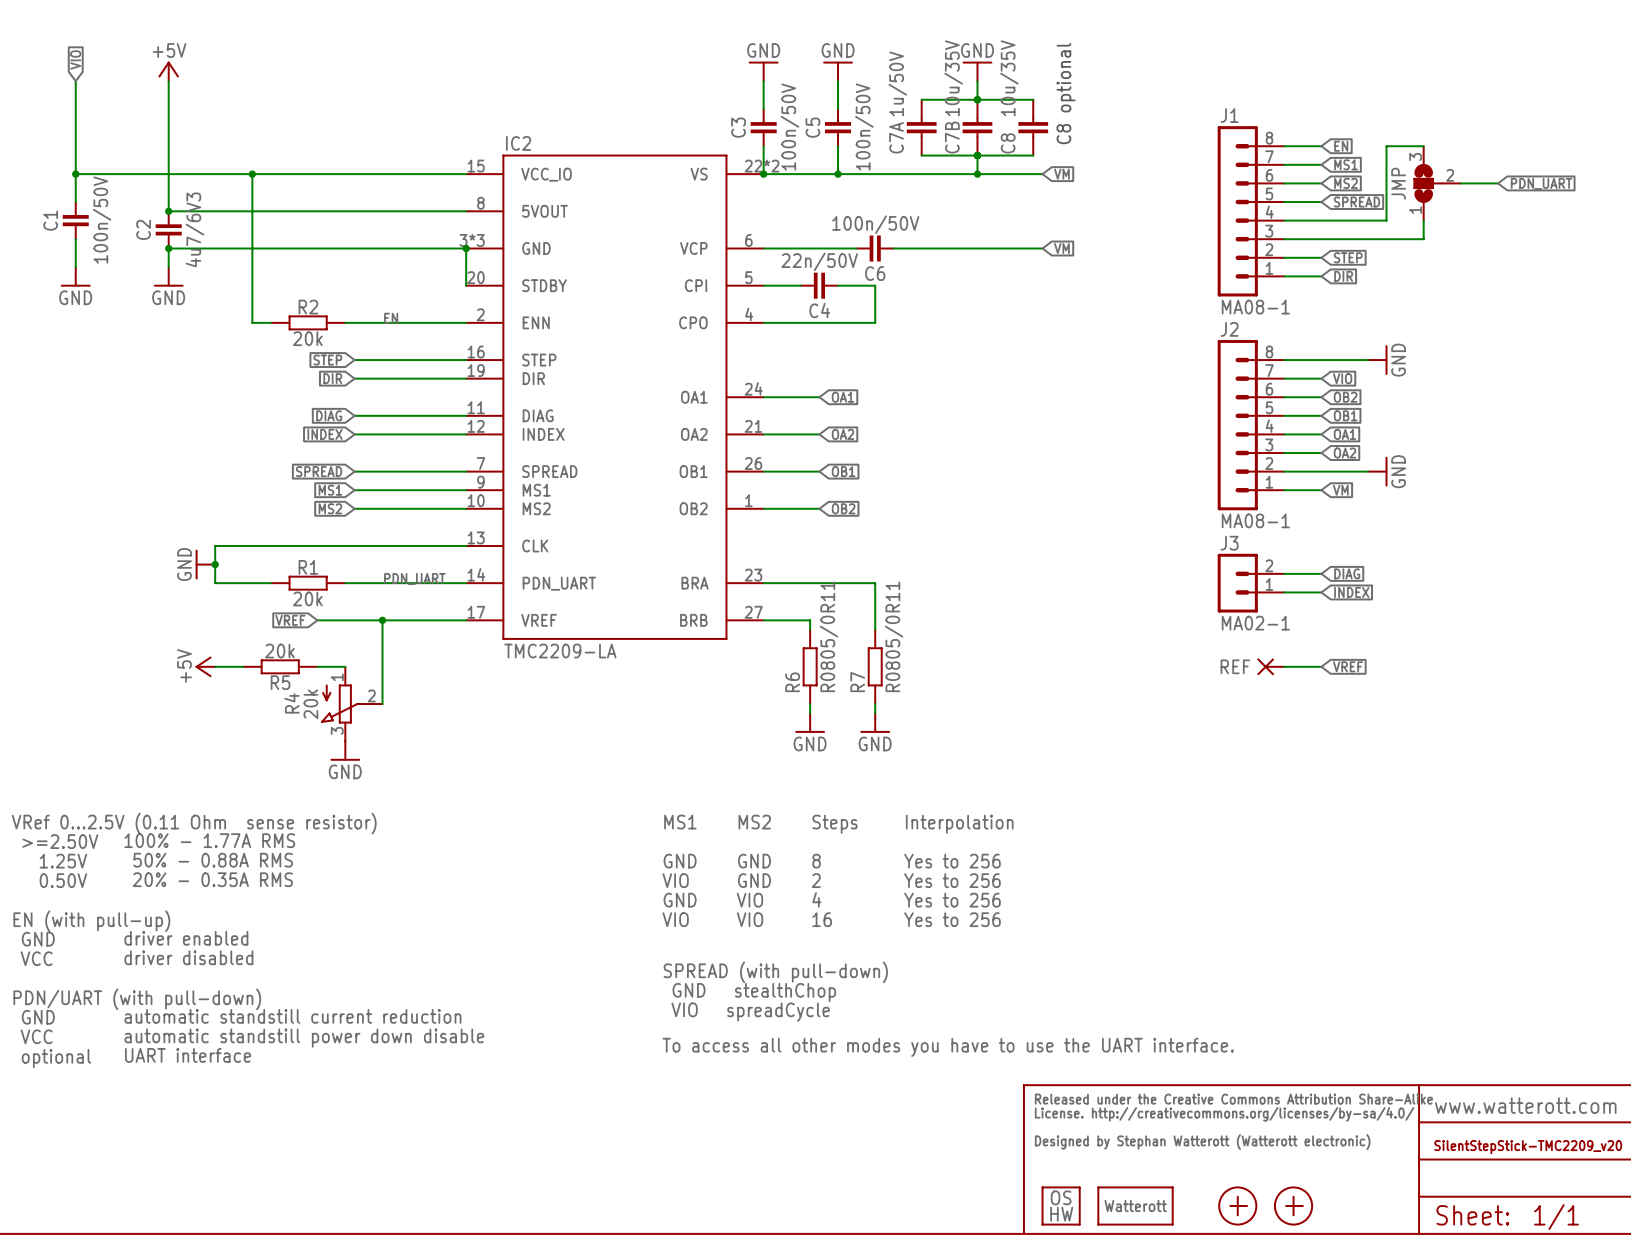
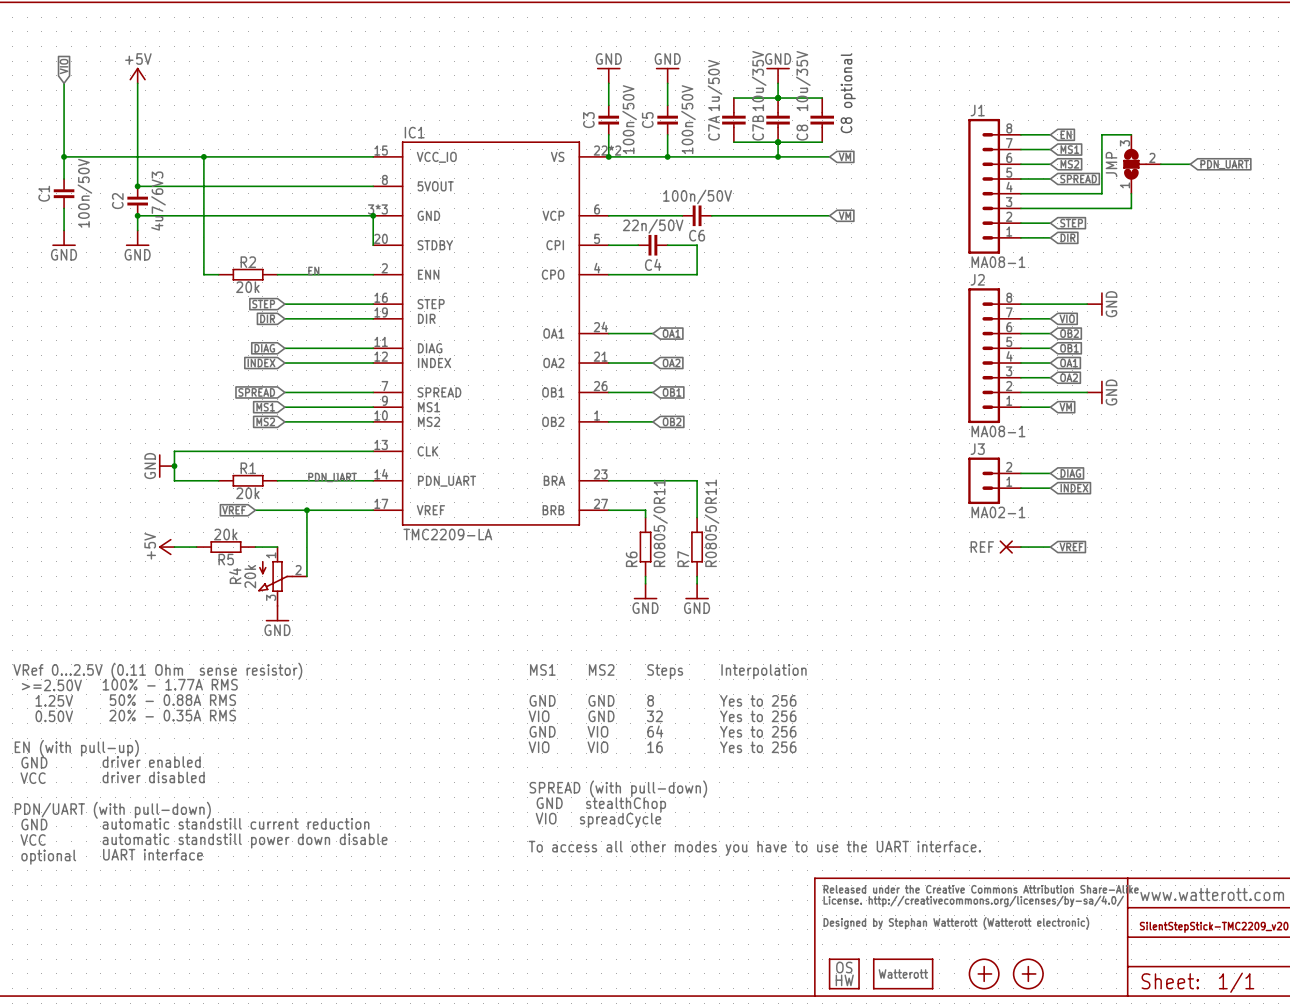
IC2 name: IC2 (518, 143) -> IC1 (414, 132)
text: 2 (816, 880) -> 32 (654, 716)
text: 4 (816, 899) -> 64 (655, 731)

